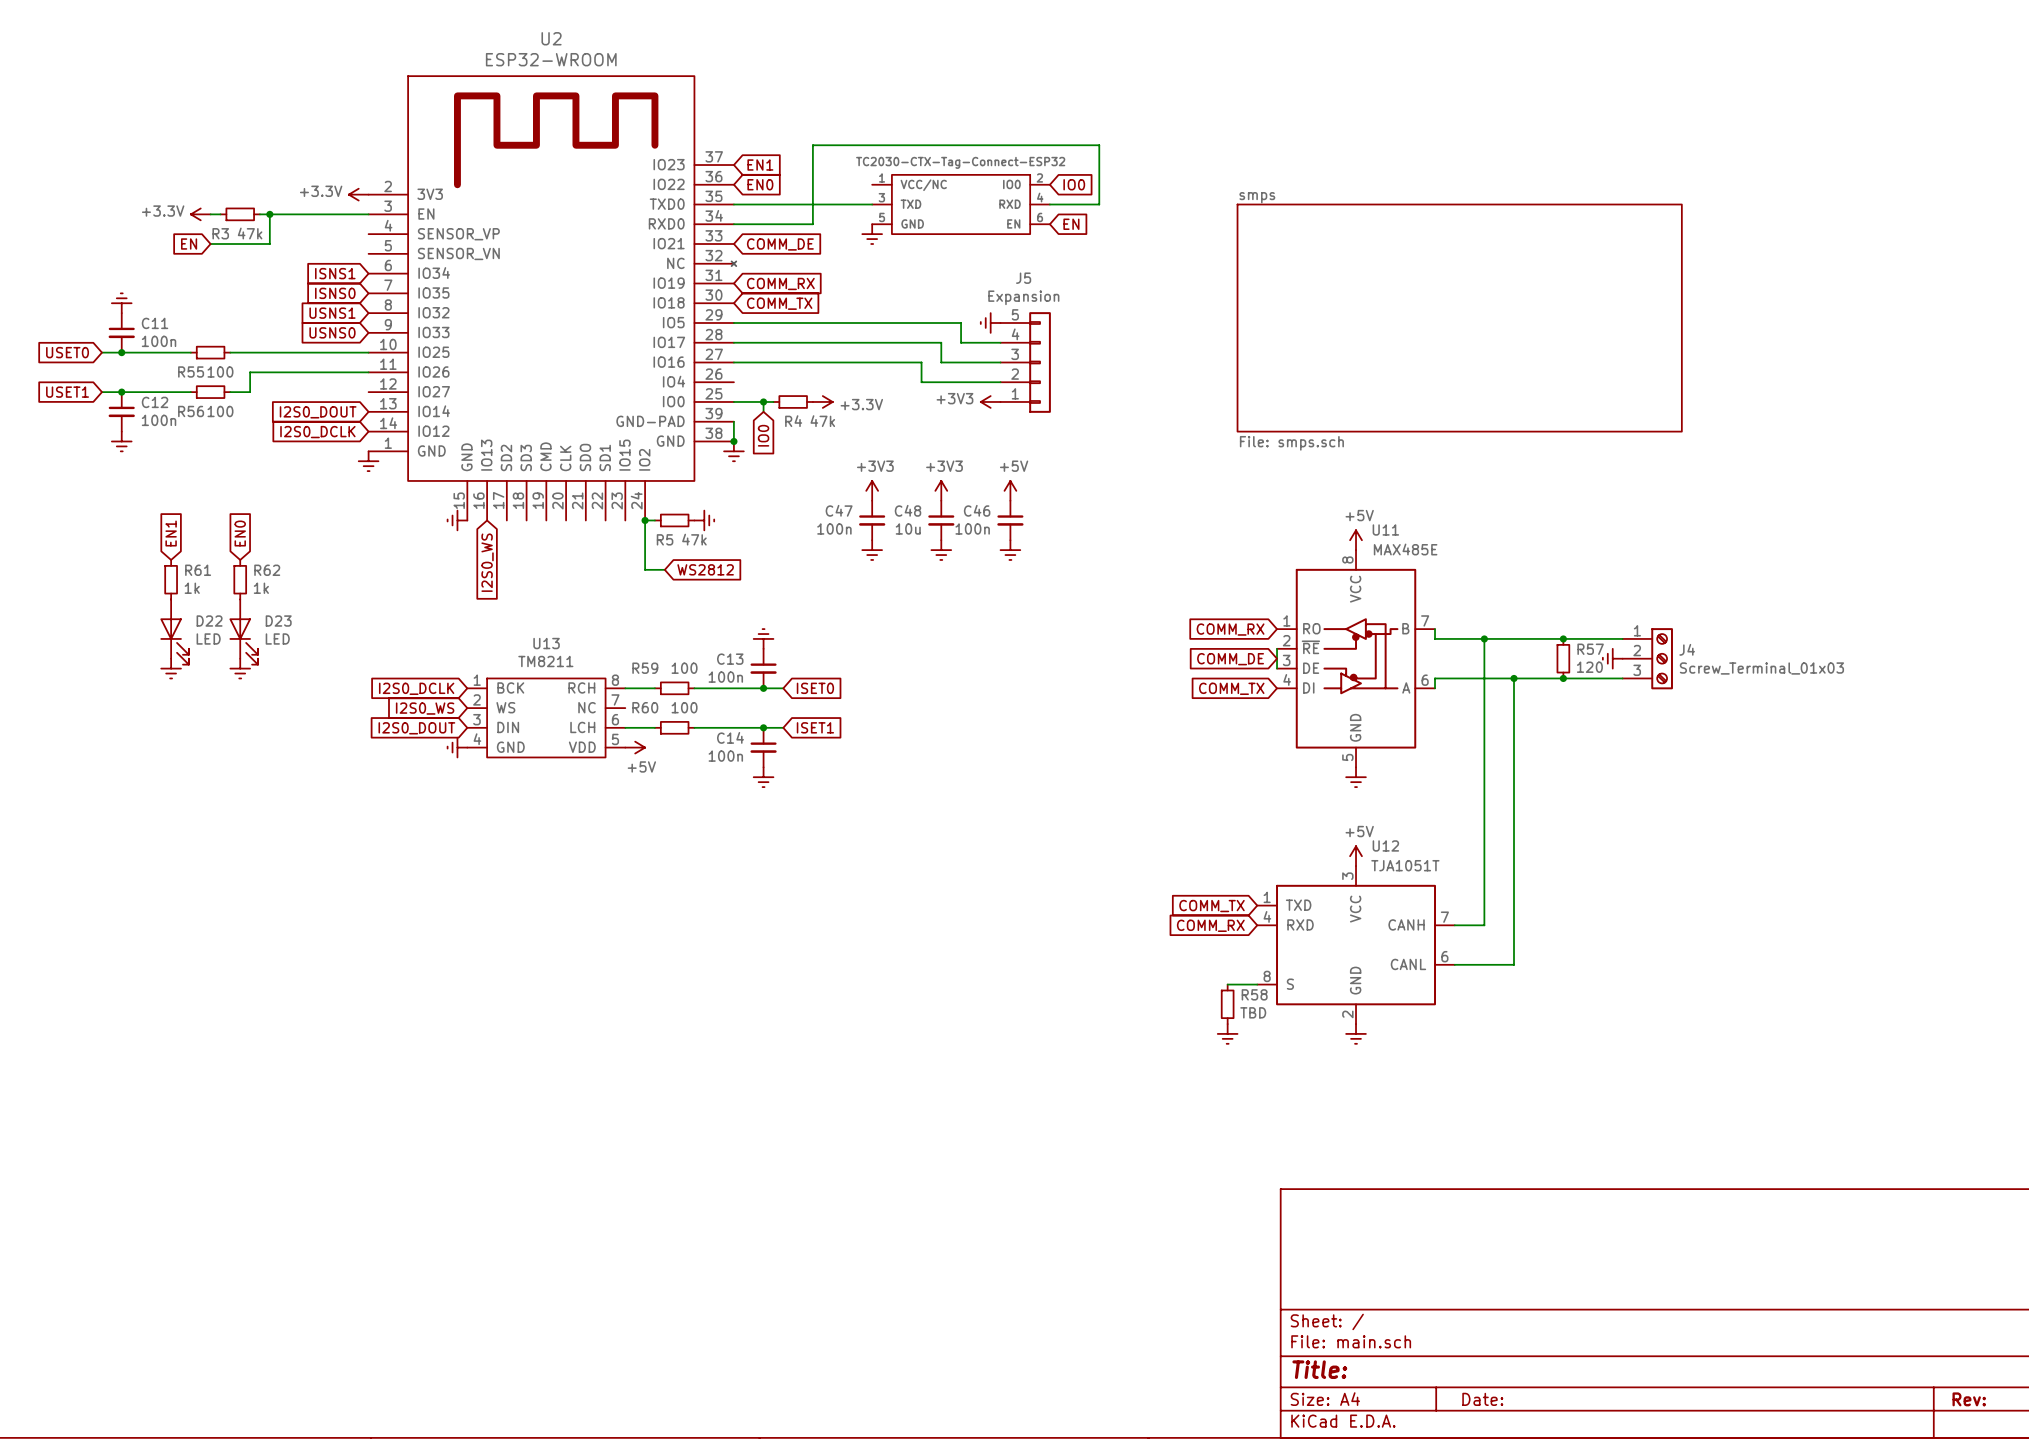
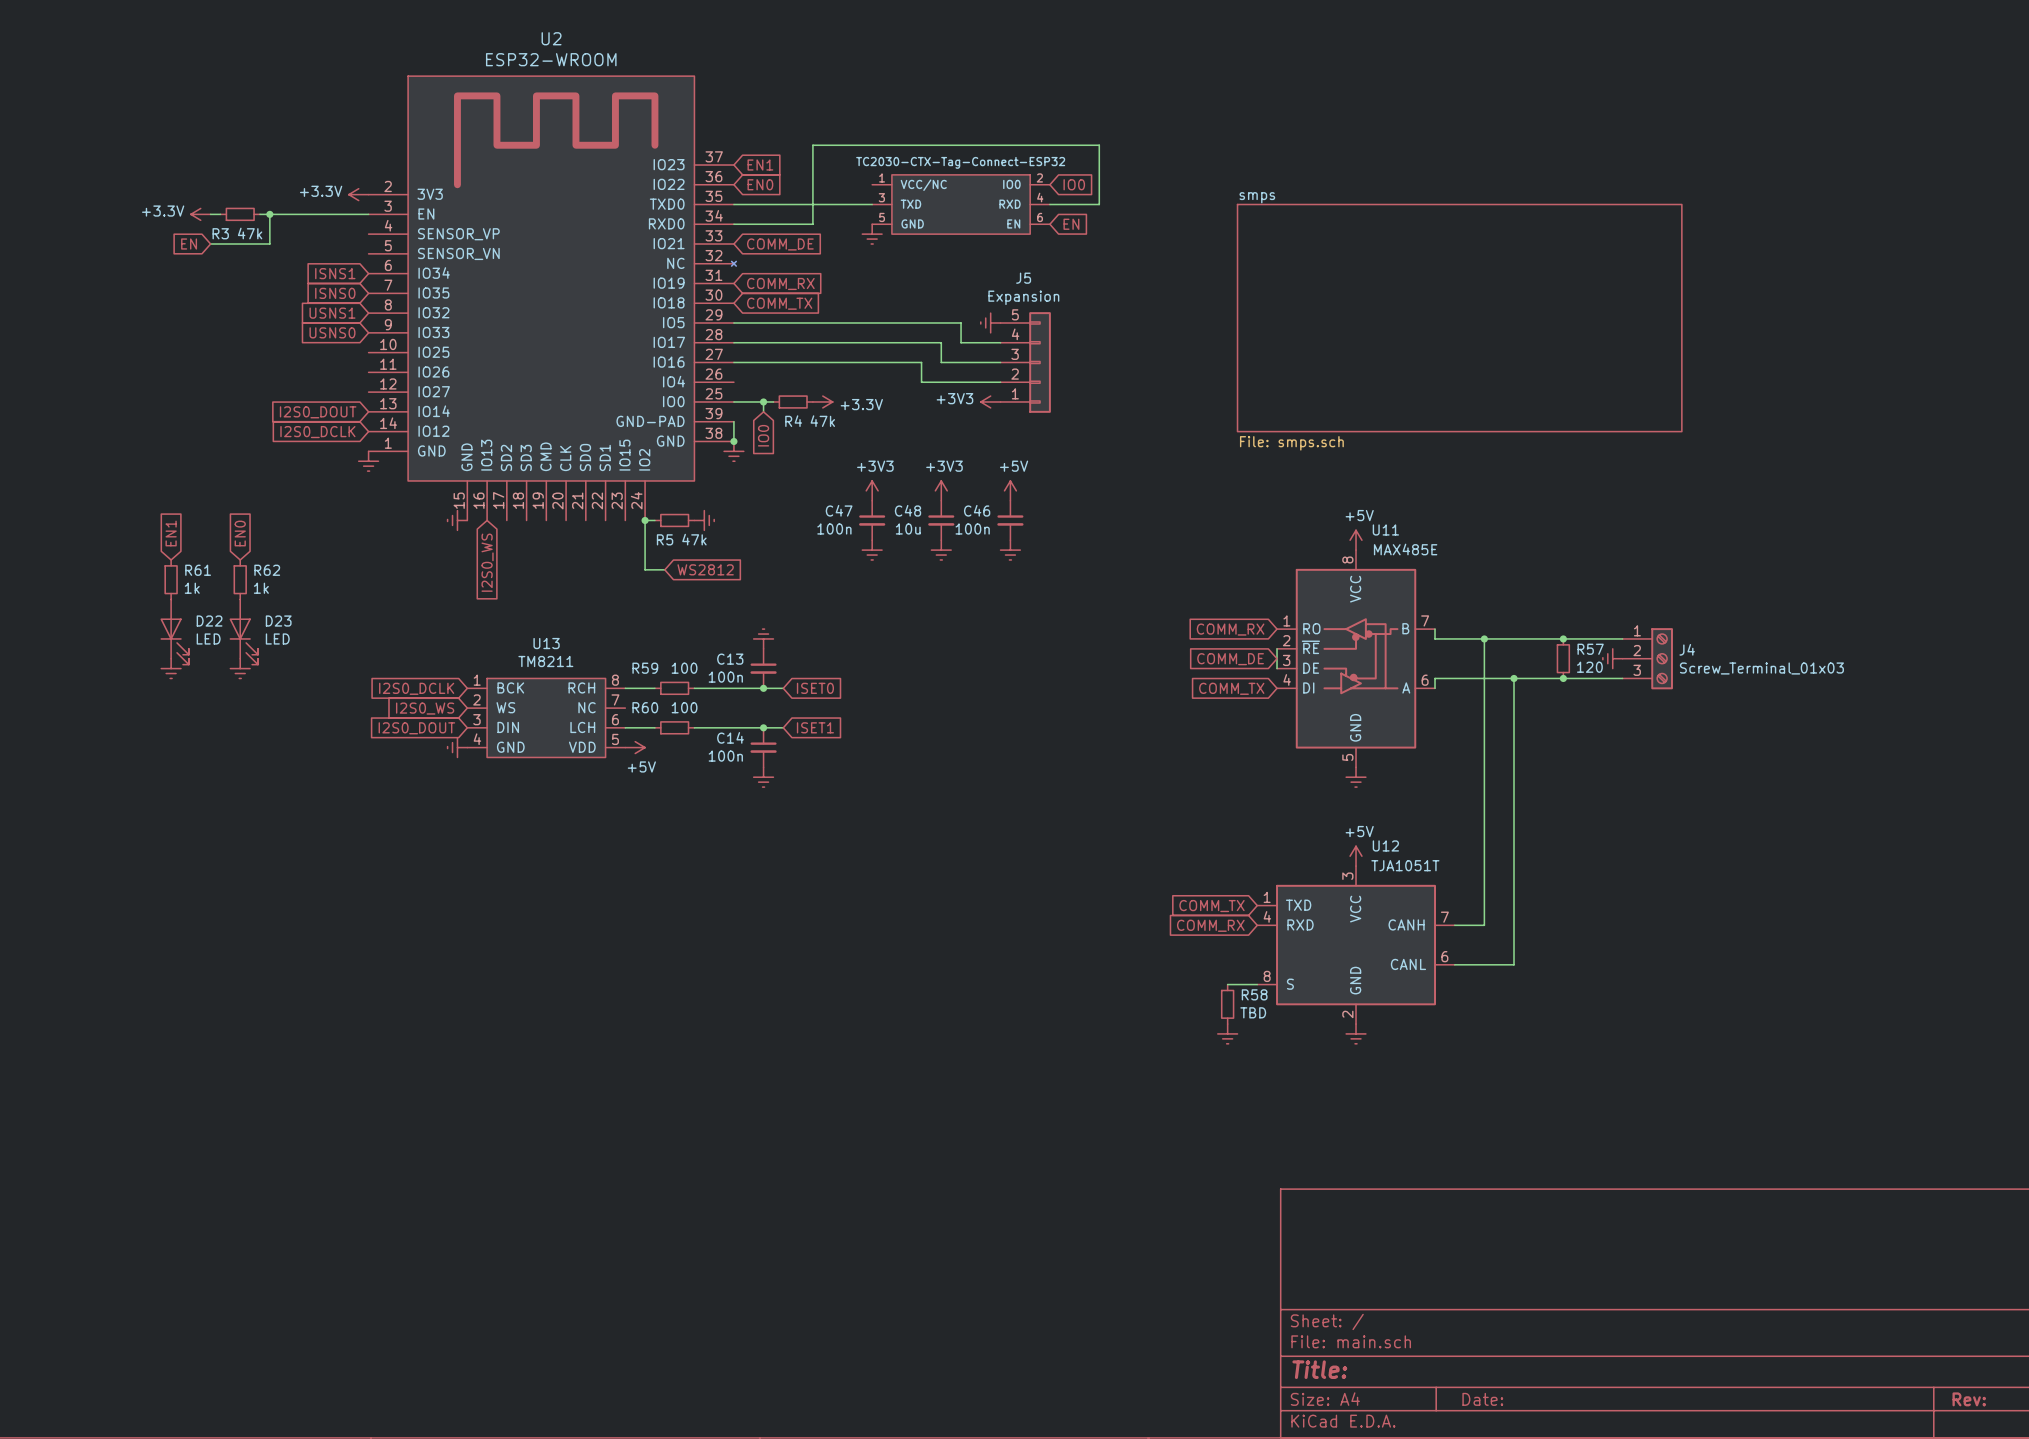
power symbol: (121, 303) -> none
C11: 100n (121, 332) -> none
global label: USET0 (67, 352) -> none
wire: (101, 352) (190, 352) -> none
junction: (121, 352) -> none
R55: 100 (210, 352) -> none
wire: (230, 352) (368, 352) -> none
wire: (368, 372) (250, 372) (250, 392) (230, 392) -> none
global label: USET1 (67, 392) -> none
wire: (101, 392) (190, 392) -> none
junction: (121, 392) -> none
R56: 100 (210, 392) -> none
C12: 100n (121, 411) -> none
power symbol: (121, 441) -> none

